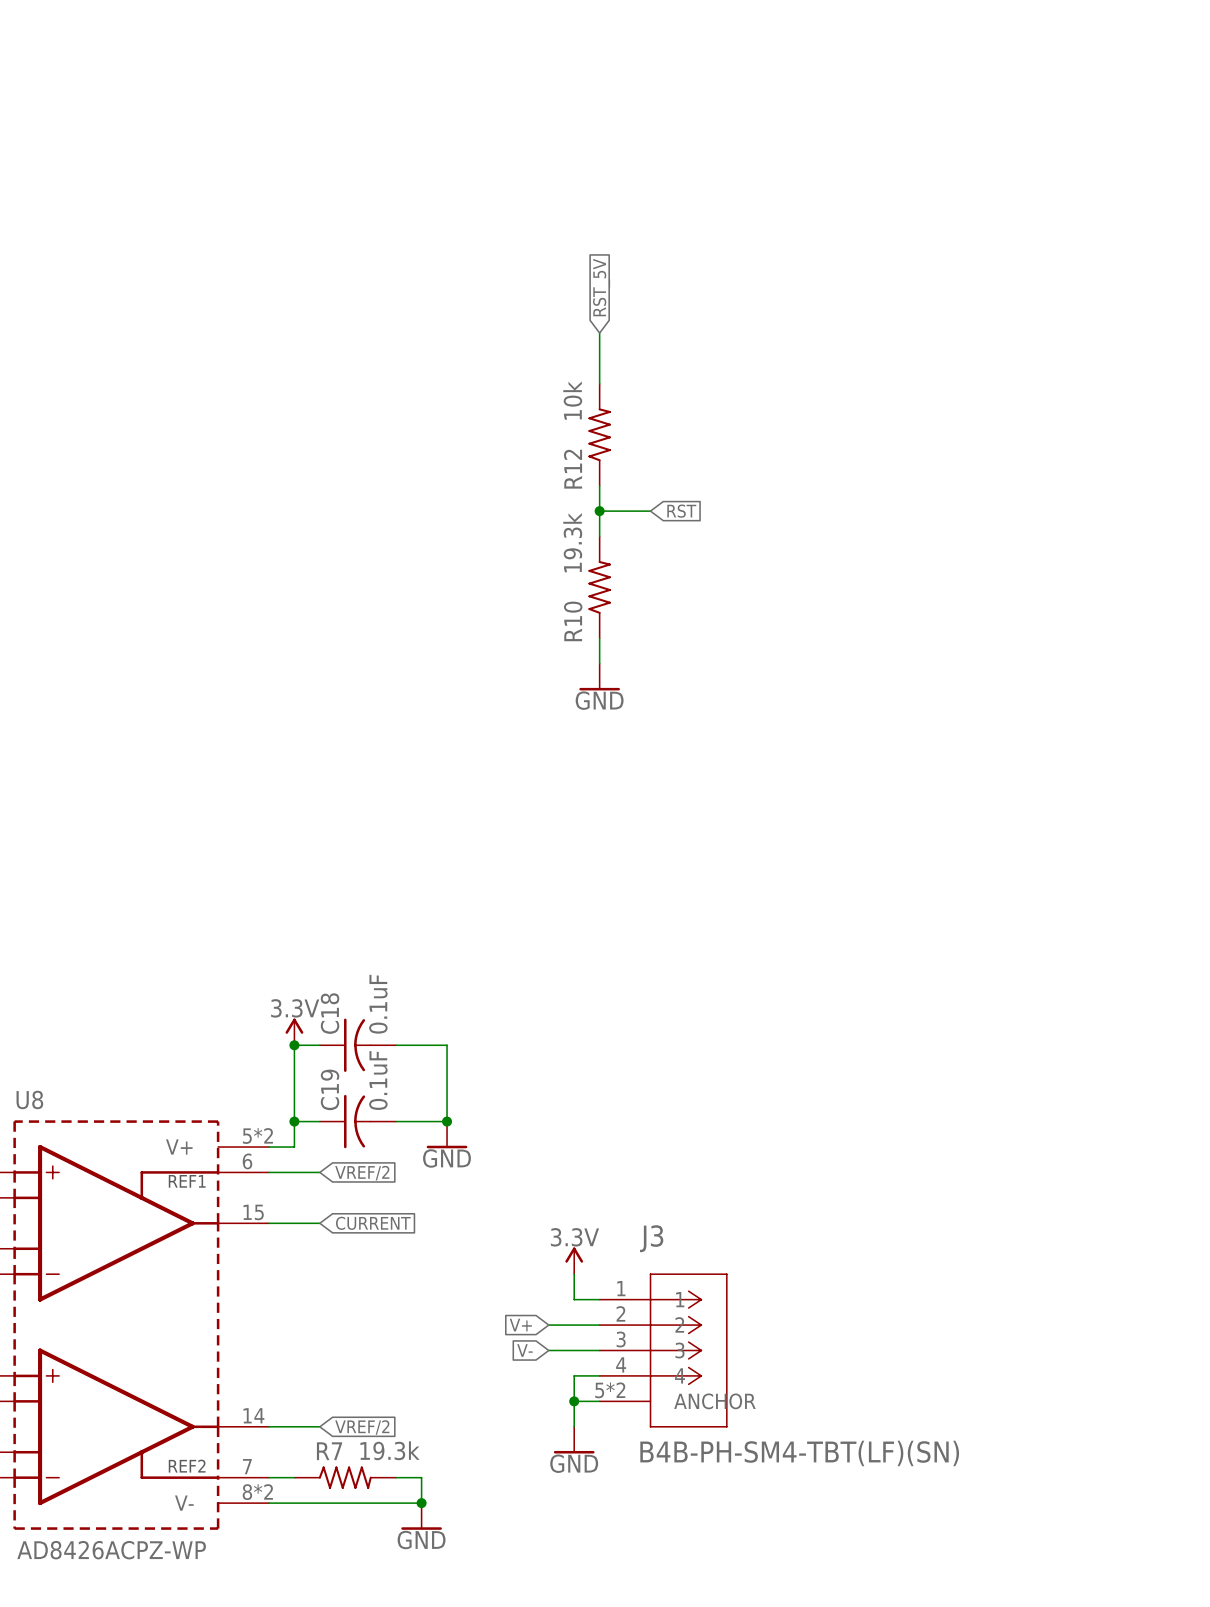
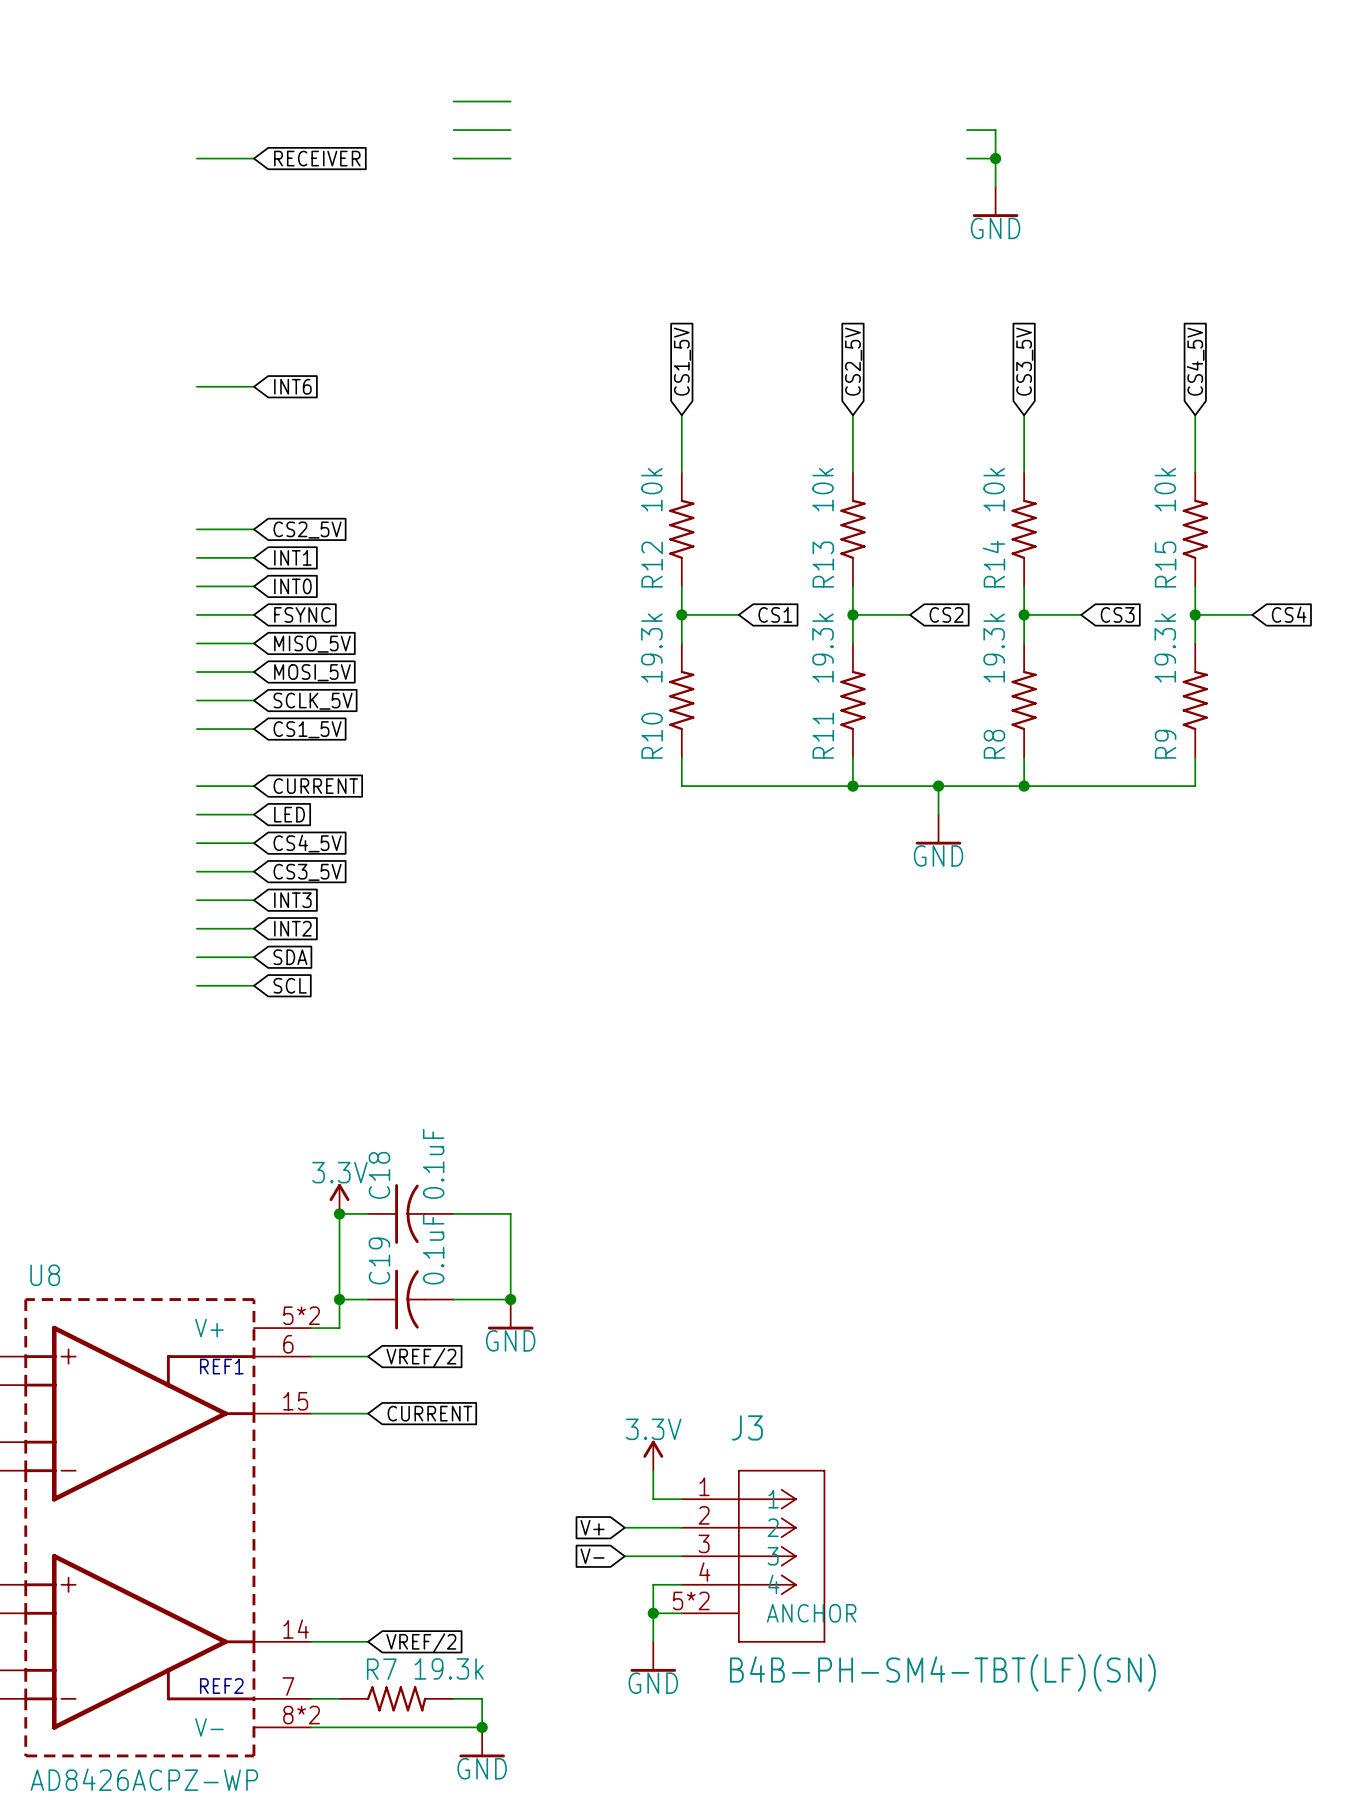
wire: none -> (453, 101) (510, 101)
wire: none -> (453, 130) (510, 130)
wire: none -> (967, 130) (995, 130) (995, 187)
wire: none -> (196, 158) (253, 158)
global label: none -> RECEIVER (317, 158)
wire: none -> (453, 158) (510, 158)
wire: none -> (967, 158) (995, 158)
junction: none -> (995, 158)
power symbol: none -> GND (995, 202)
global label: RST_5V (601, 287) -> CS1_5V (682, 361)
global label: none -> CS2_5V (853, 361)
global label: none -> CS3_5V (1024, 361)
global label: none -> CS4_5V (1195, 361)
wire: none -> (196, 386) (253, 386)
global label: none -> INT6 (292, 386)
wire: none -> (852, 415) (852, 472)
wire: none -> (1024, 415) (1024, 472)
wire: none -> (1195, 415) (1195, 472)
wire: none -> (196, 529) (253, 529)
R13: none -> 10k (852, 529)
R14: none -> 10k (1024, 529)
R15: none -> 10k (1195, 529)
global label: none -> CS2_5V (307, 530)
wire: none -> (196, 557) (253, 557)
global label: none -> INT1 (292, 557)
wire: none -> (196, 586) (253, 586)
global label: none -> INT0 (292, 586)
wire: none -> (852, 586) (852, 643)
wire: none -> (1024, 586) (1024, 643)
wire: none -> (1195, 586) (1195, 643)
wire: none -> (196, 614) (253, 614)
global label: none -> FSYNC (302, 614)
global label: RST (681, 511) -> CS1 (775, 614)
wire: none -> (852, 614) (910, 614)
junction: none -> (852, 614)
global label: none -> CS2 (946, 614)
wire: none -> (1024, 614) (1081, 614)
junction: none -> (1024, 614)
global label: none -> CS3 (1117, 614)
wire: none -> (1195, 614) (1252, 614)
junction: none -> (1195, 614)
global label: none -> CS4 (1289, 614)
wire: none -> (196, 643) (253, 643)
global label: none -> MISO_5V (312, 644)
wire: none -> (196, 672) (253, 672)
global label: none -> MOSI_5V (312, 672)
wire: none -> (196, 700) (253, 700)
R11: none -> 19.3k (852, 700)
R8: none -> 19.3k (1024, 700)
R9: none -> 19.3k (1195, 700)
global label: none -> SCLK_5V (313, 701)
wire: none -> (196, 729) (253, 729)
global label: none -> CS1_5V (307, 729)
wire: none -> (852, 757) (852, 786)
wire: none -> (1024, 757) (1024, 786)
wire: none -> (1195, 757) (1195, 786) (681, 786)
wire: none -> (196, 786) (253, 786)
global label: none -> CURRENT (315, 786)
junction: none -> (852, 786)
wire: none -> (938, 786) (938, 814)
junction: none -> (938, 786)
junction: none -> (1024, 786)
power symbol position: GND (599, 677) -> GND (938, 829)
wire: none -> (196, 814) (253, 814)
global label: none -> LED (289, 814)
wire: none -> (196, 843) (253, 843)
global label: none -> CS4_5V (307, 843)
wire: none -> (196, 871) (253, 871)
global label: none -> CS3_5V (307, 872)
wire: none -> (196, 900) (253, 900)
global label: none -> INT3 (292, 900)
wire: none -> (196, 928) (253, 928)
global label: none -> INT2 (292, 928)
wire: none -> (196, 957) (253, 957)
global label: none -> SDA (290, 957)
wire: none -> (196, 985) (253, 985)
global label: none -> SCL (290, 985)

